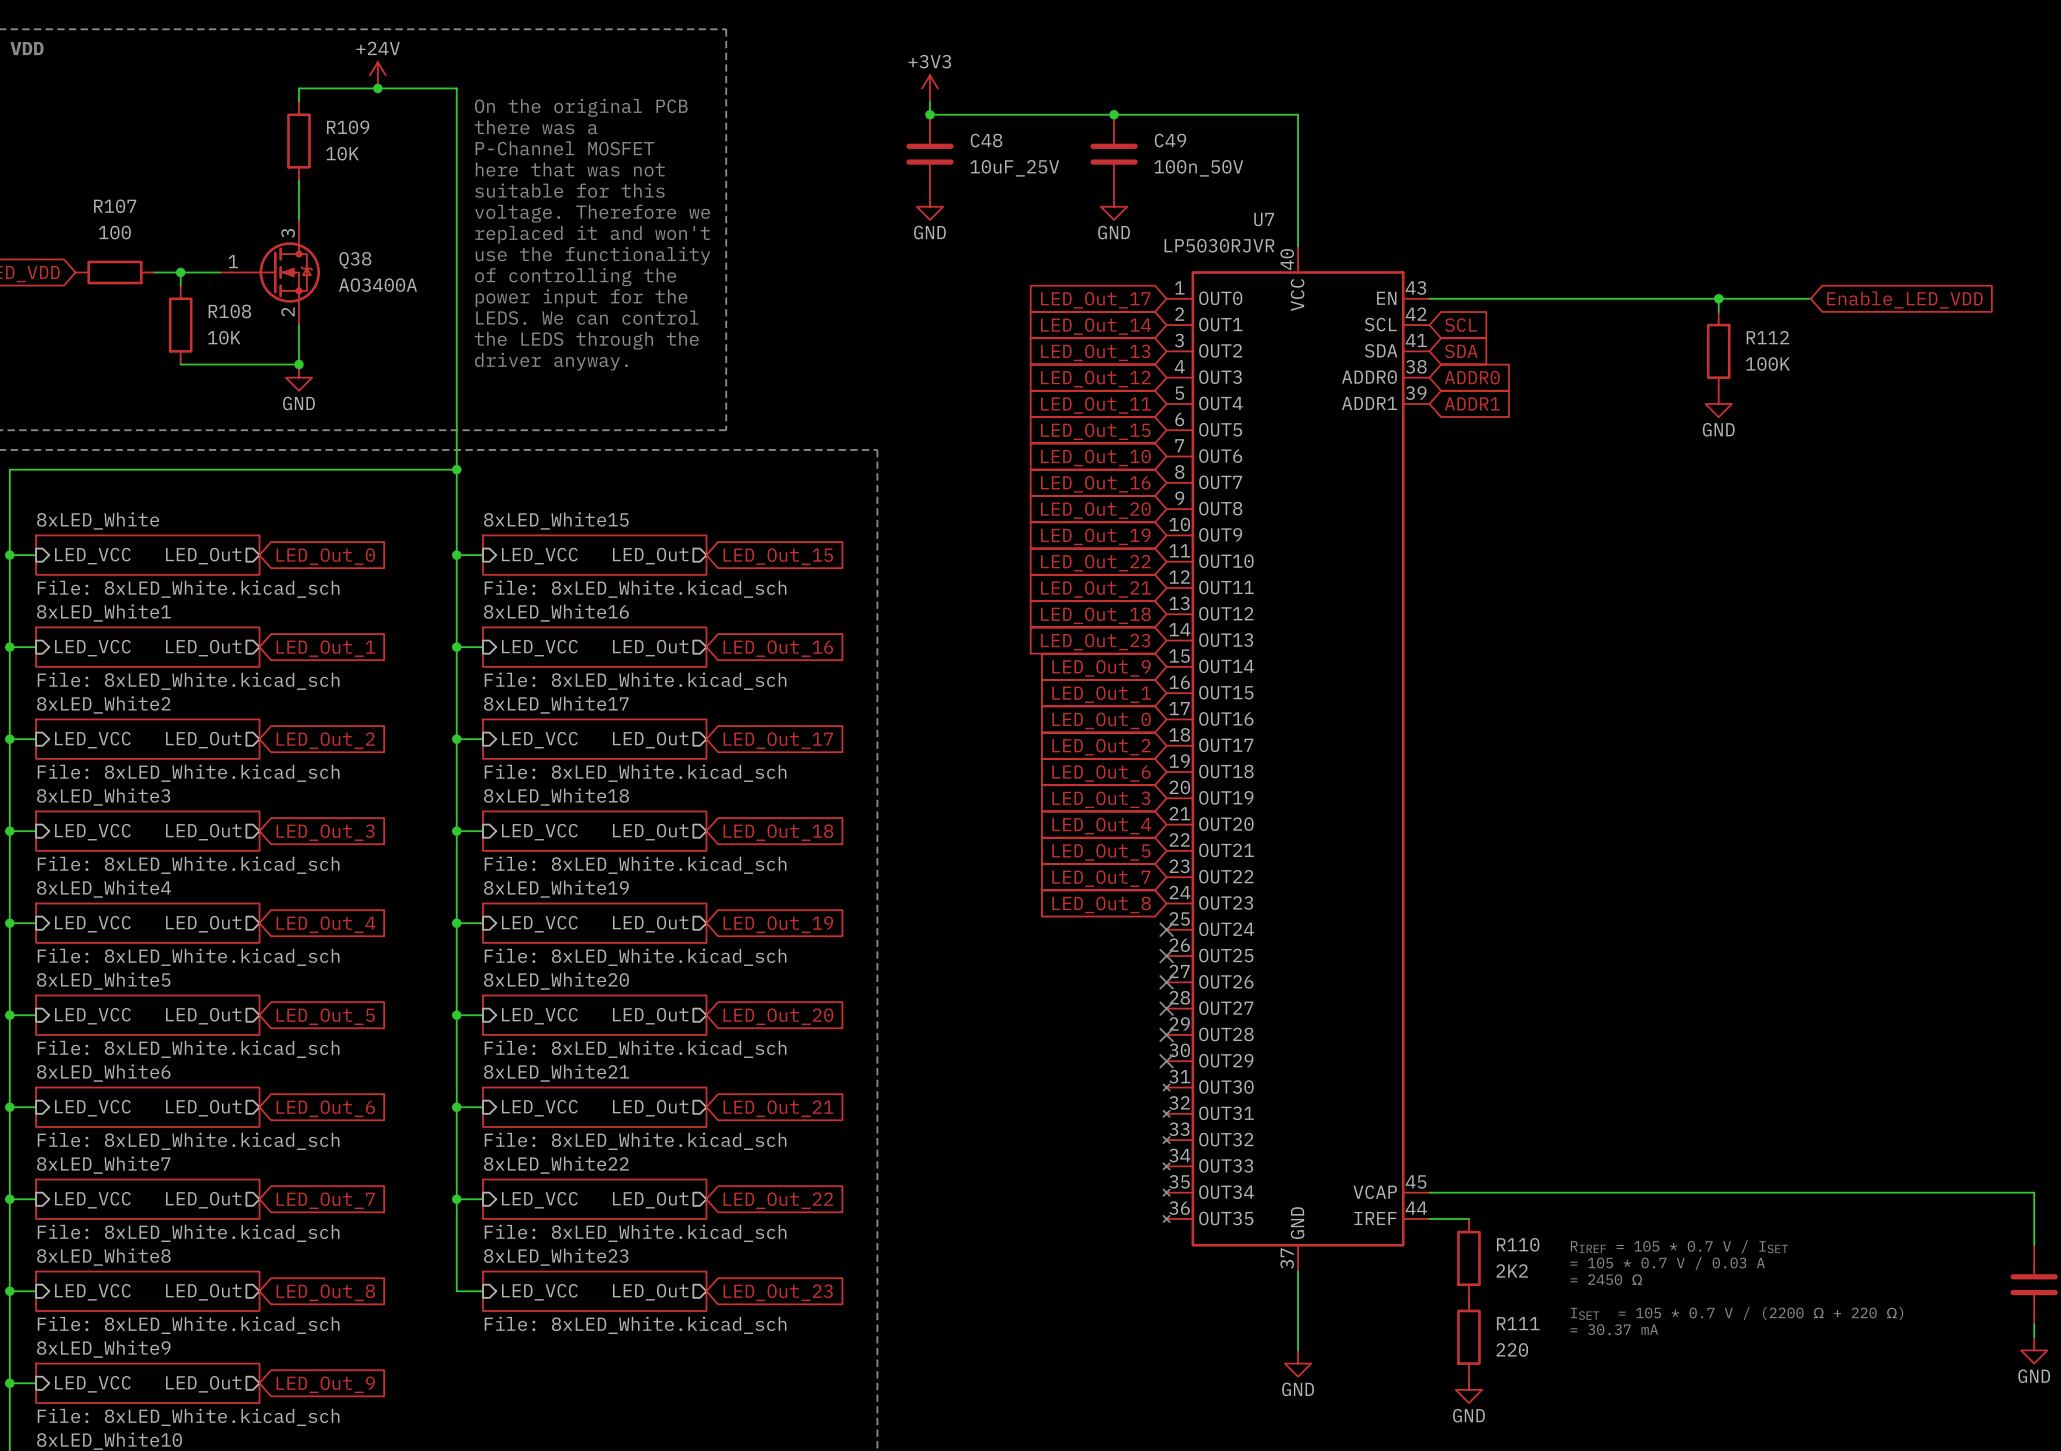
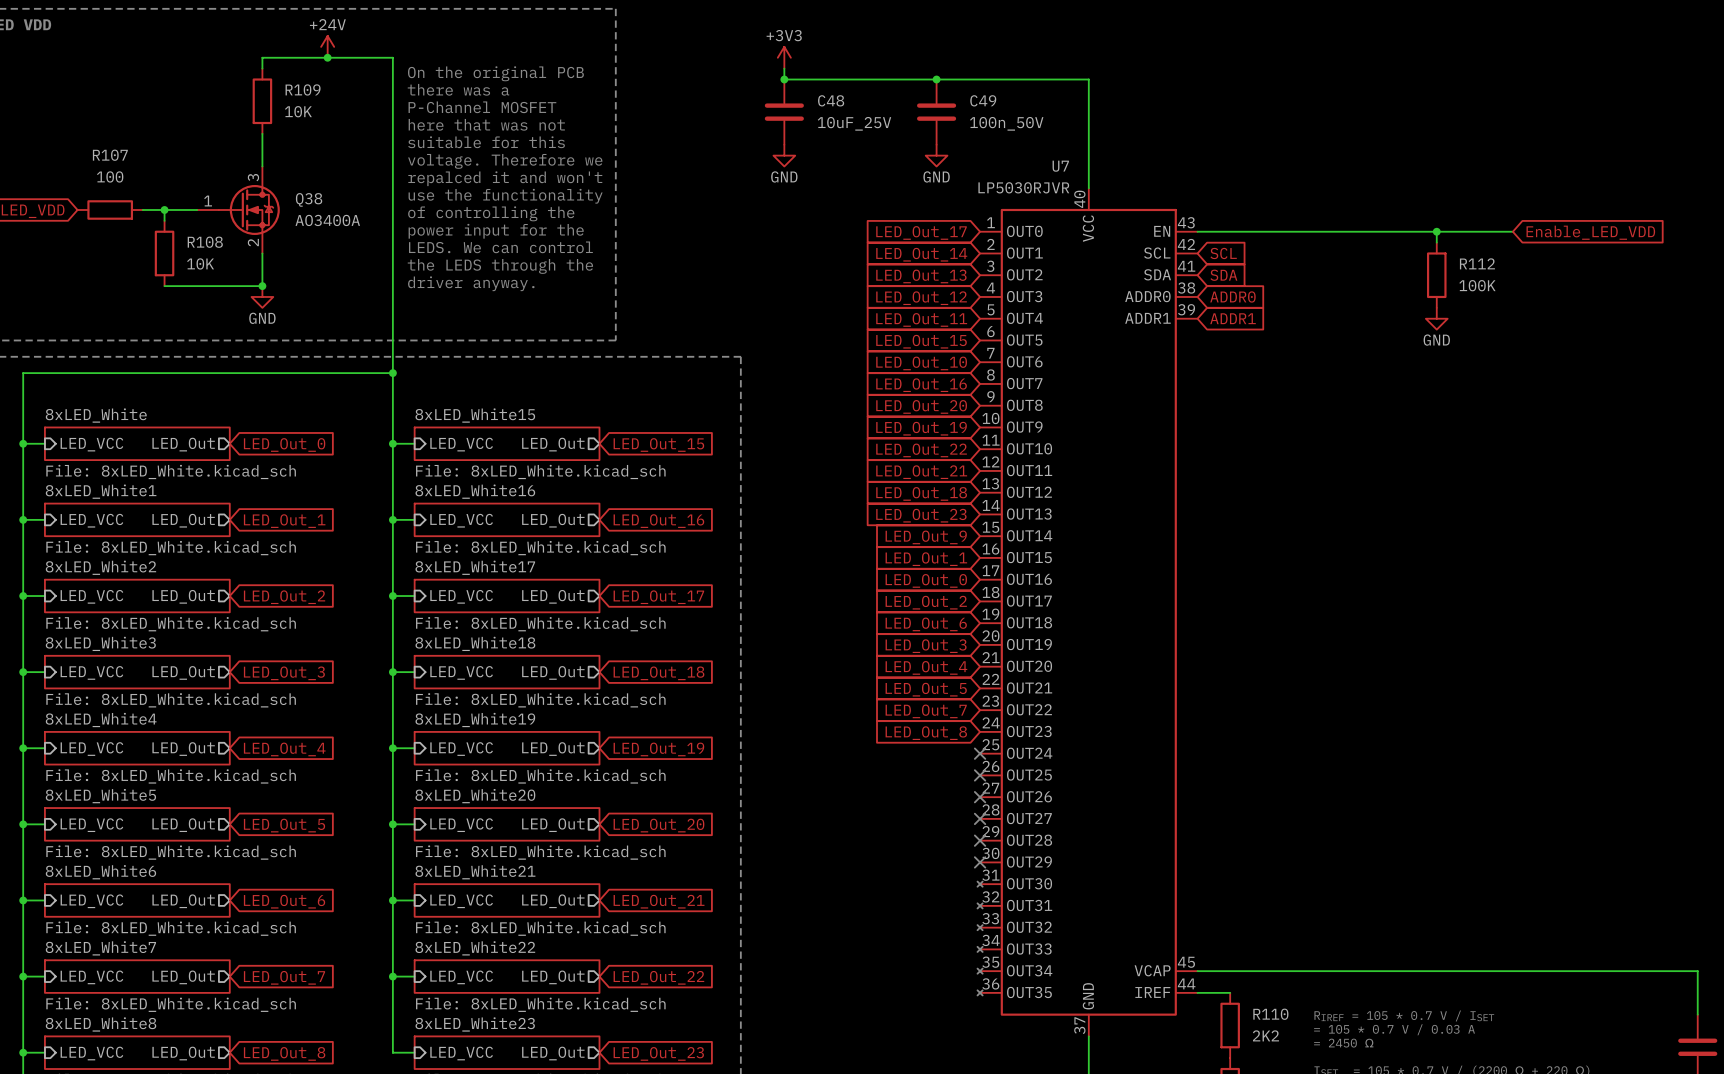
text: replaced it and won't (592, 234) -> repalced it and won't (505, 178)

